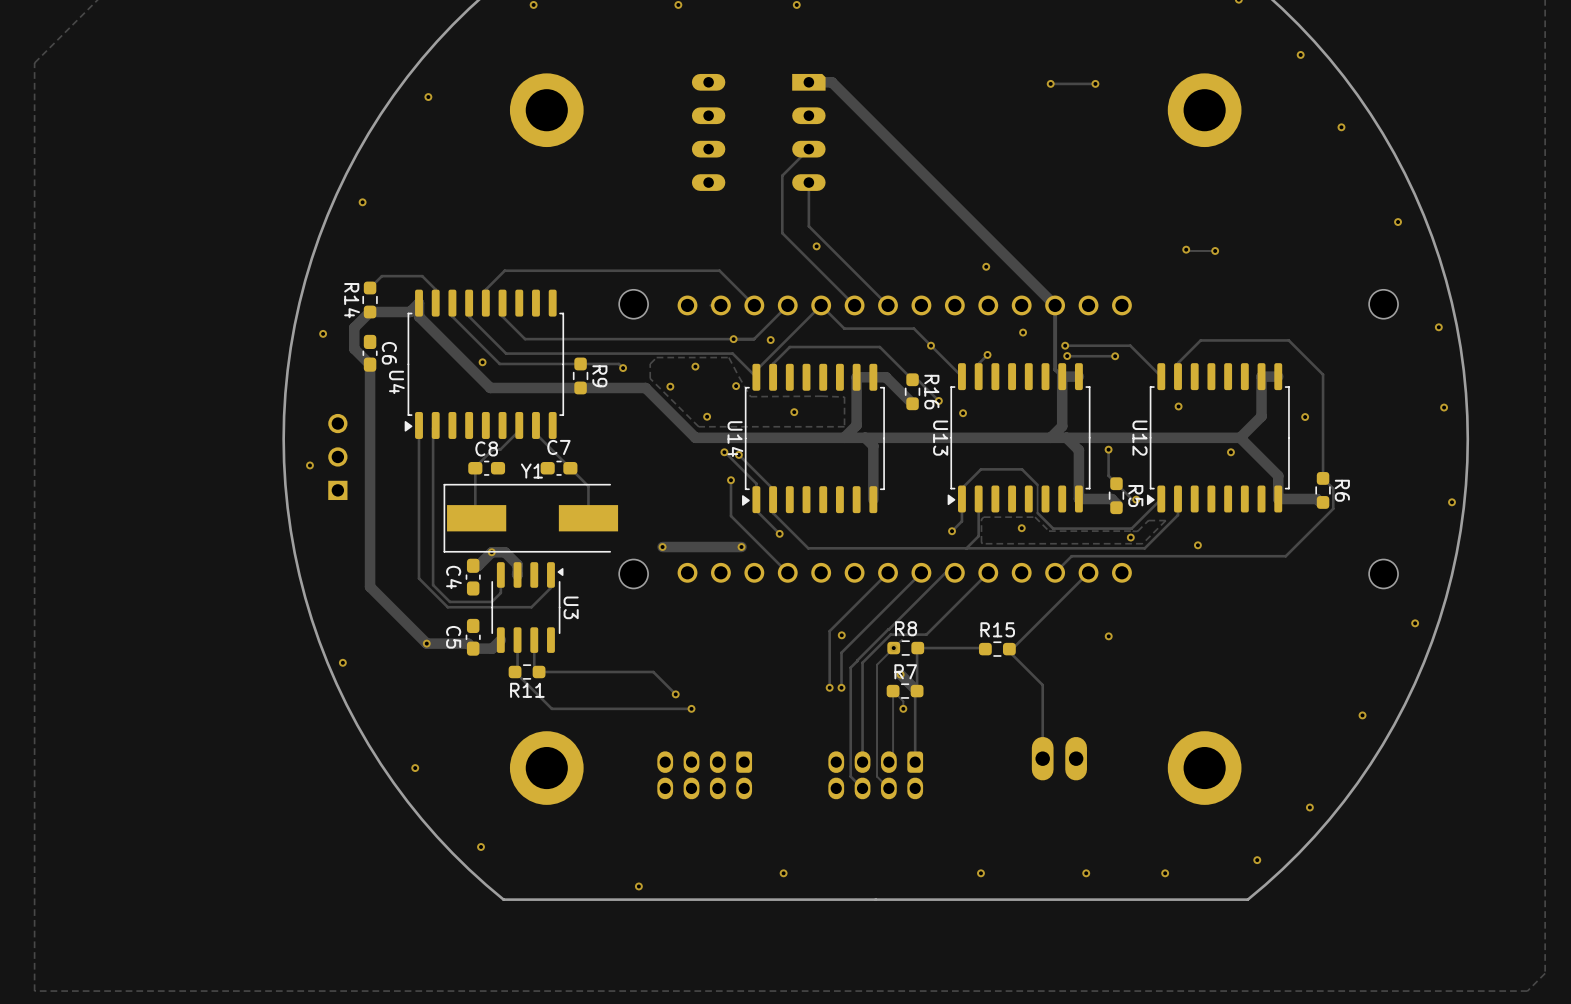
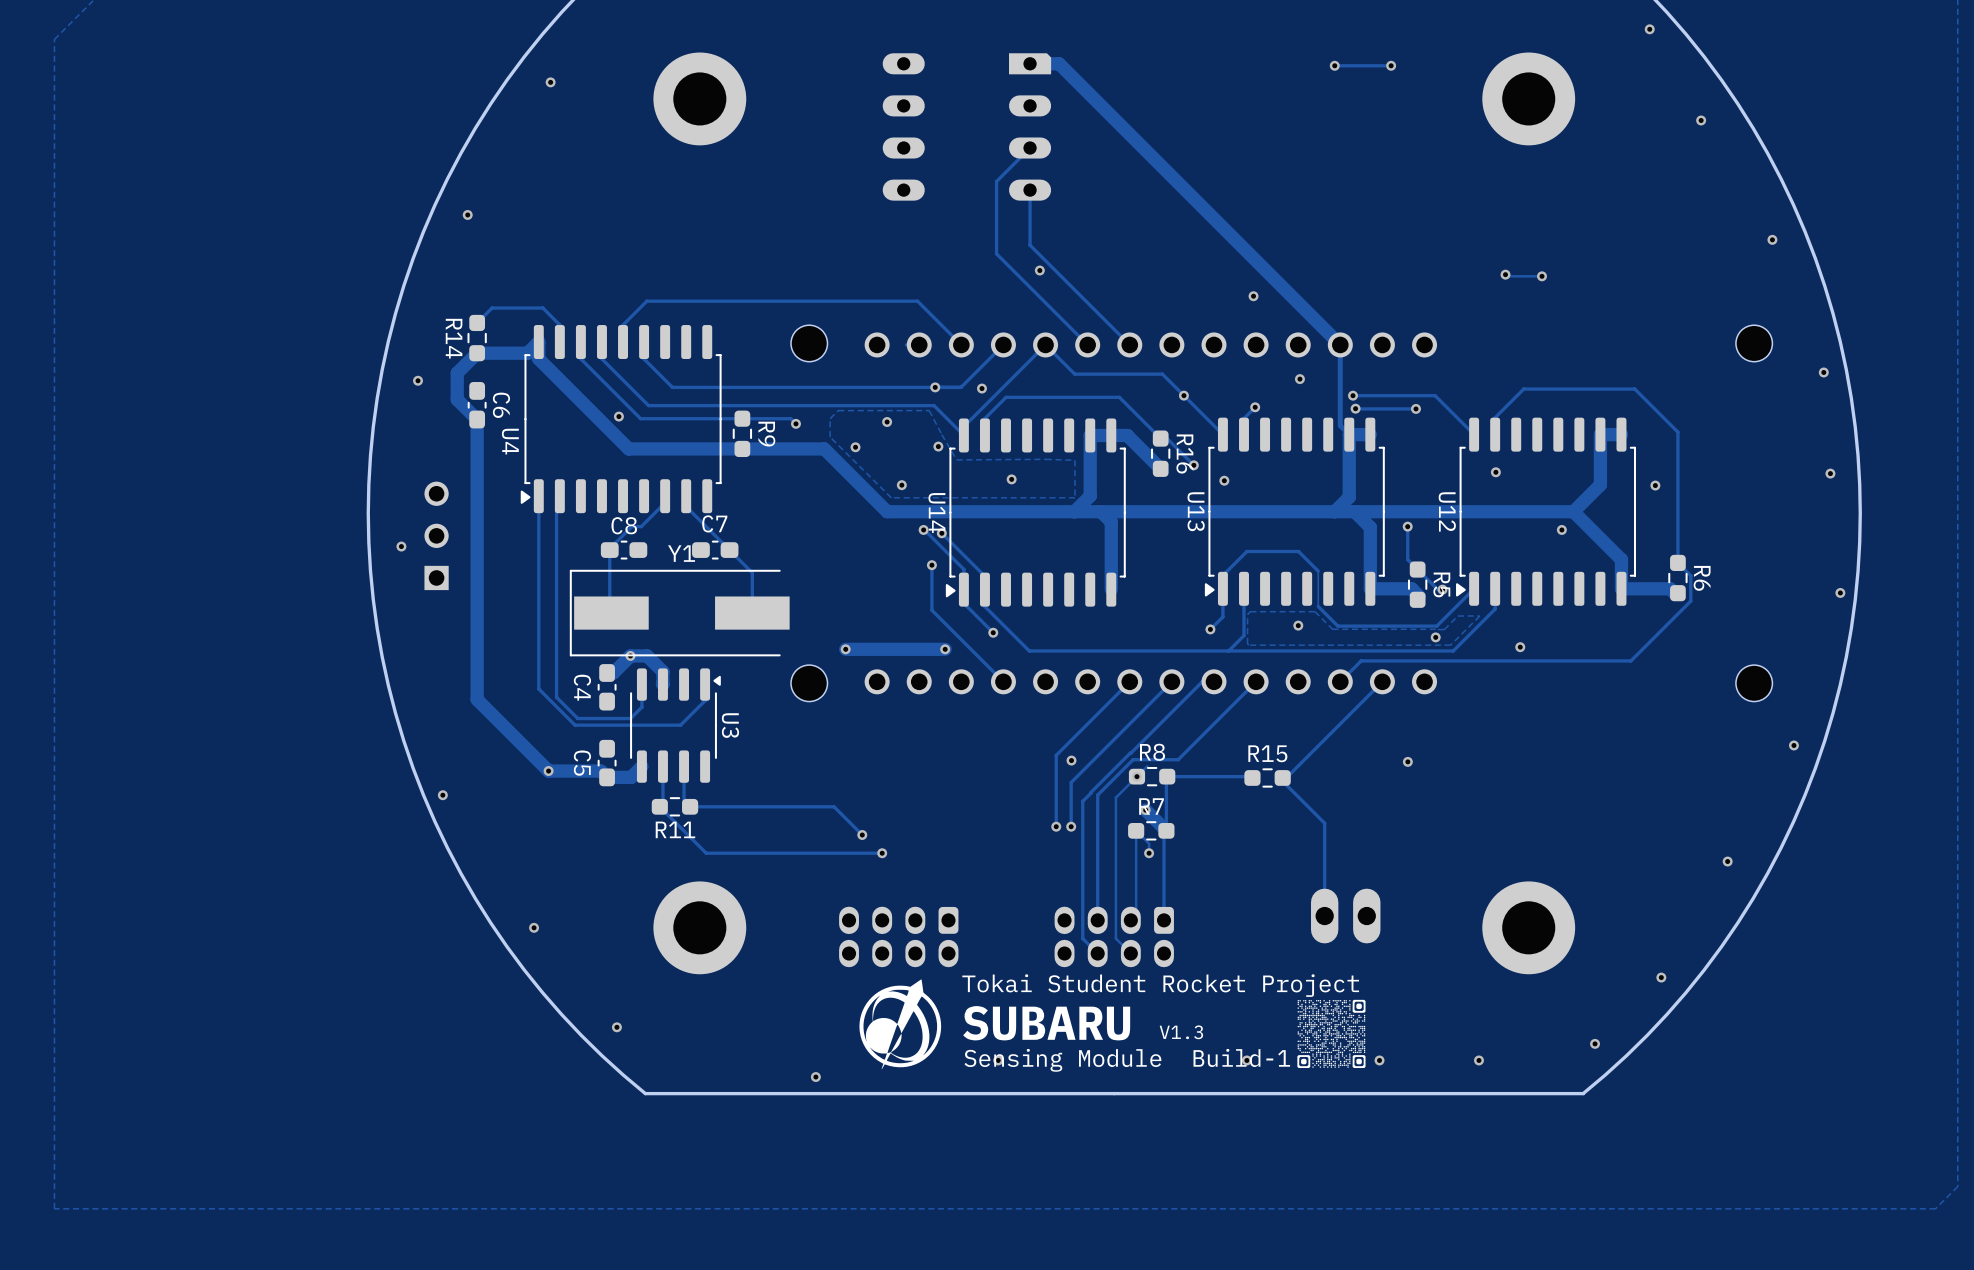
drawing: none -> [859, 979, 942, 1070]
text: none -> Tokai Student Rocket Project (1160, 985)
drawing: none -> [1297, 999, 1366, 1069]
text: none -> SUBARU (1046, 1023)
text: none -> V1.3 (1181, 1032)
text: none -> Sensing Module Build-1 (1127, 1060)

